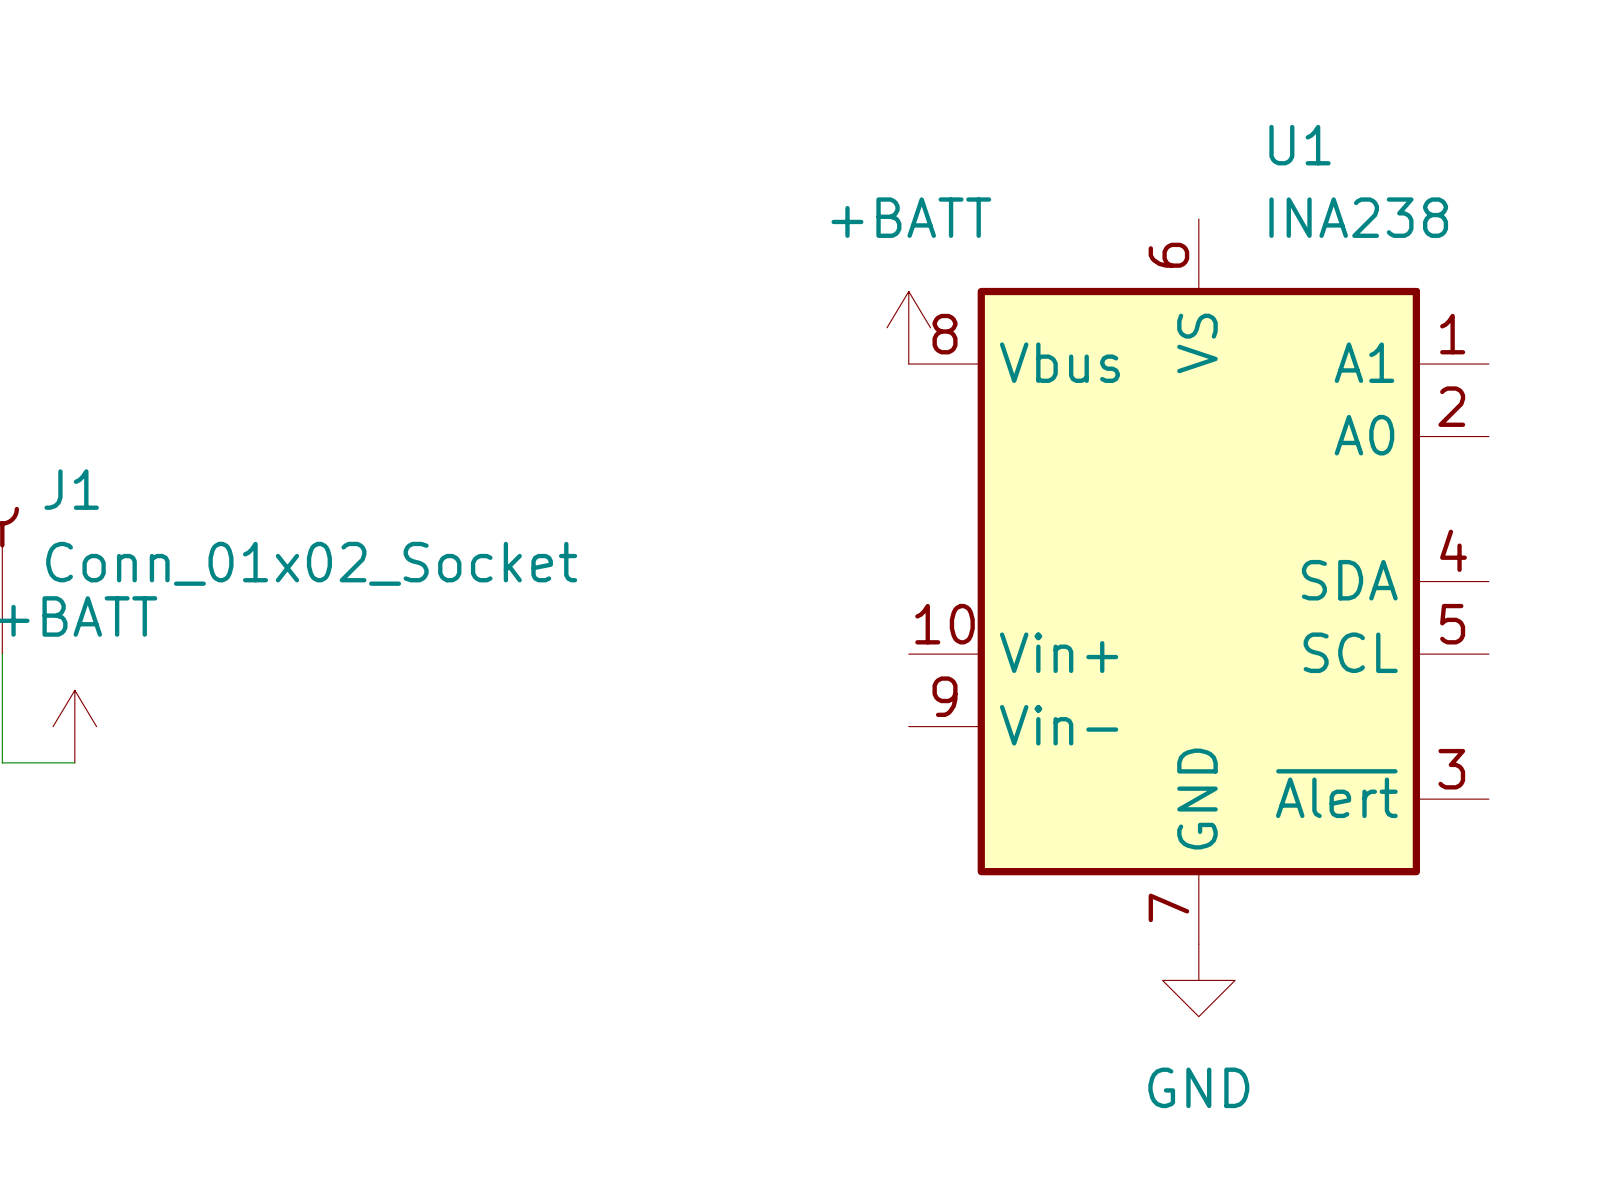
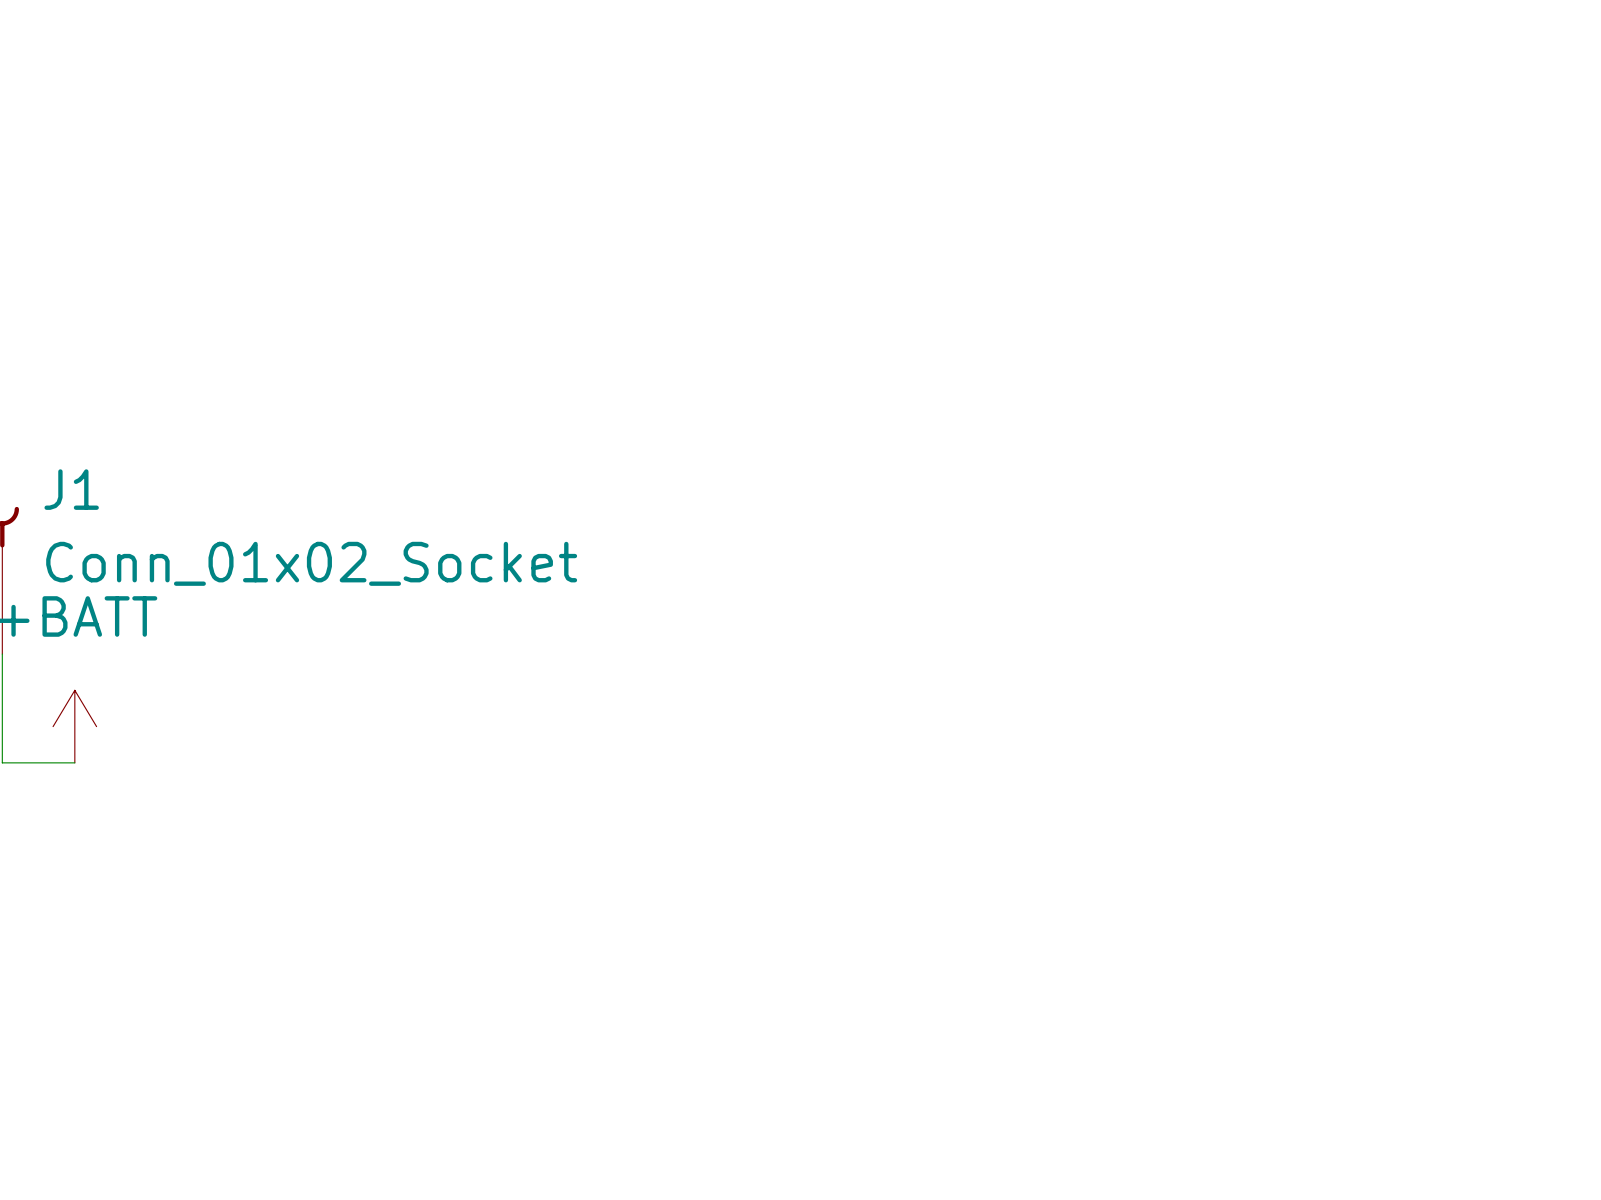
power symbol: +BATT (908, 327) -> none
U1: INA238 (1198, 581) -> none
power symbol: GND (1198, 980) -> none

